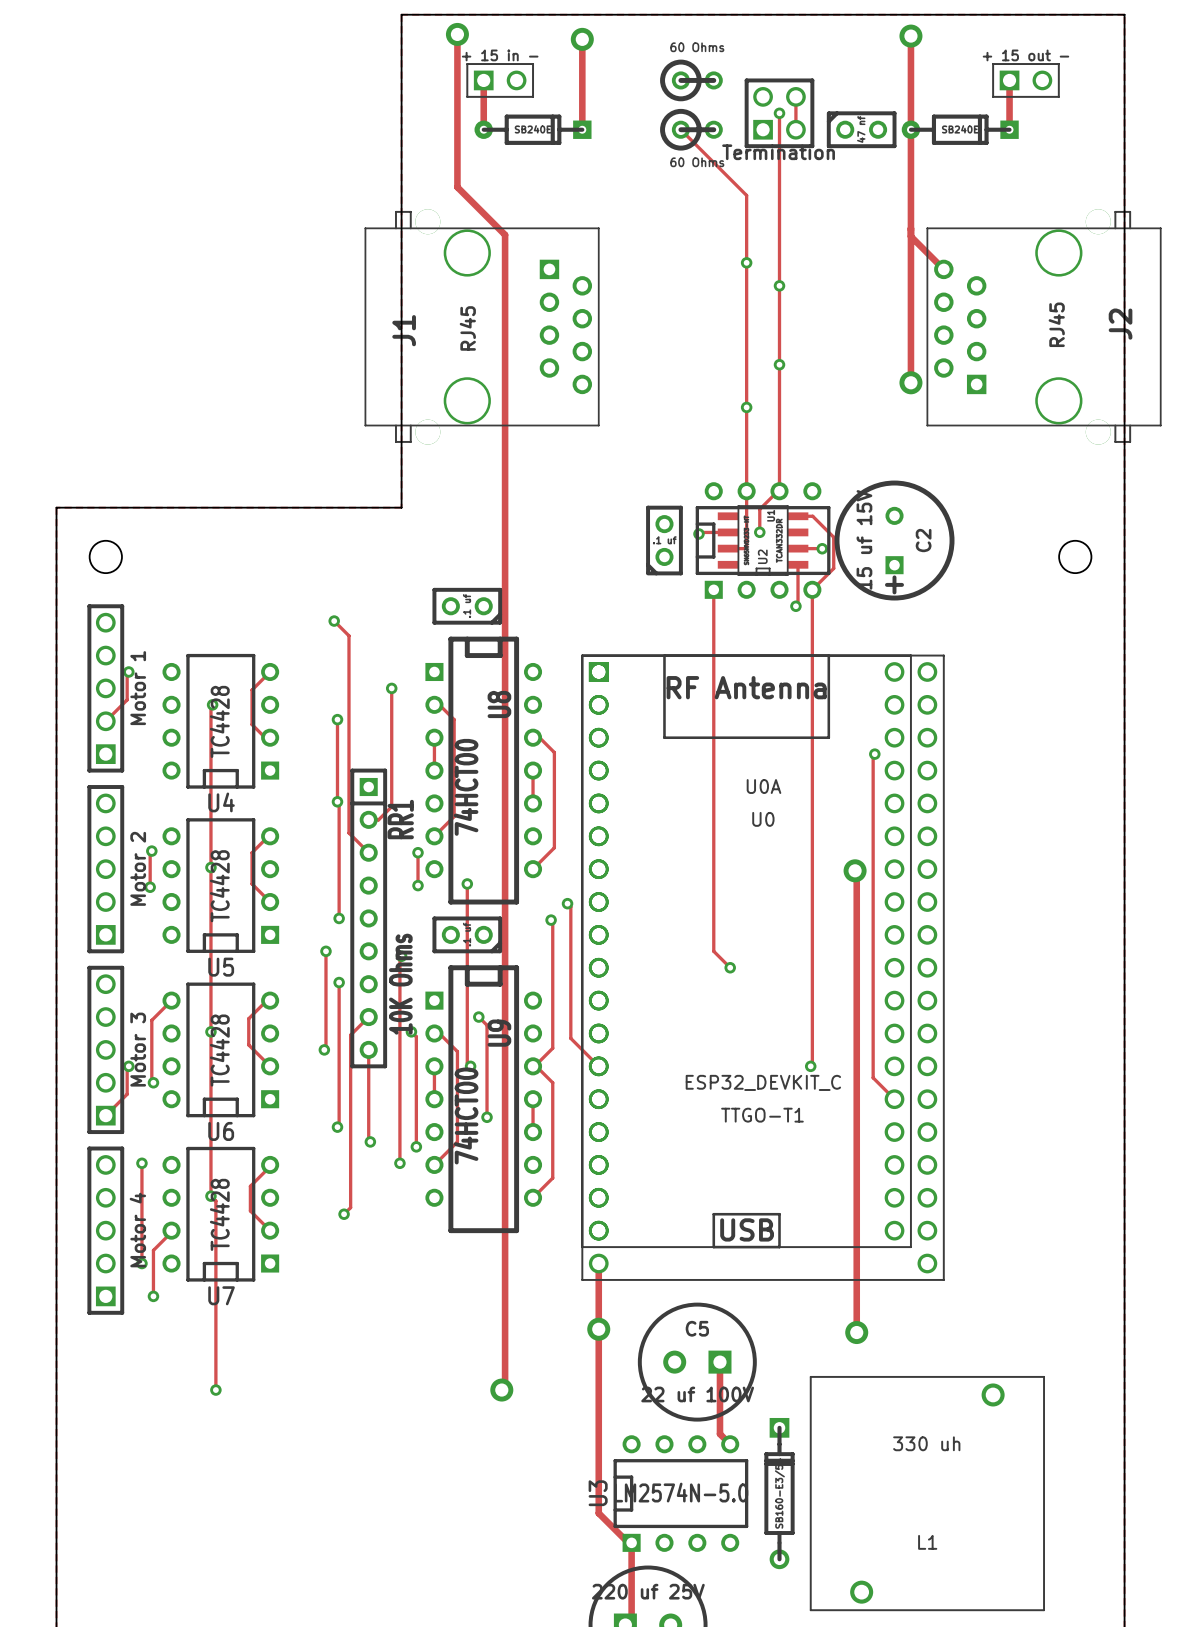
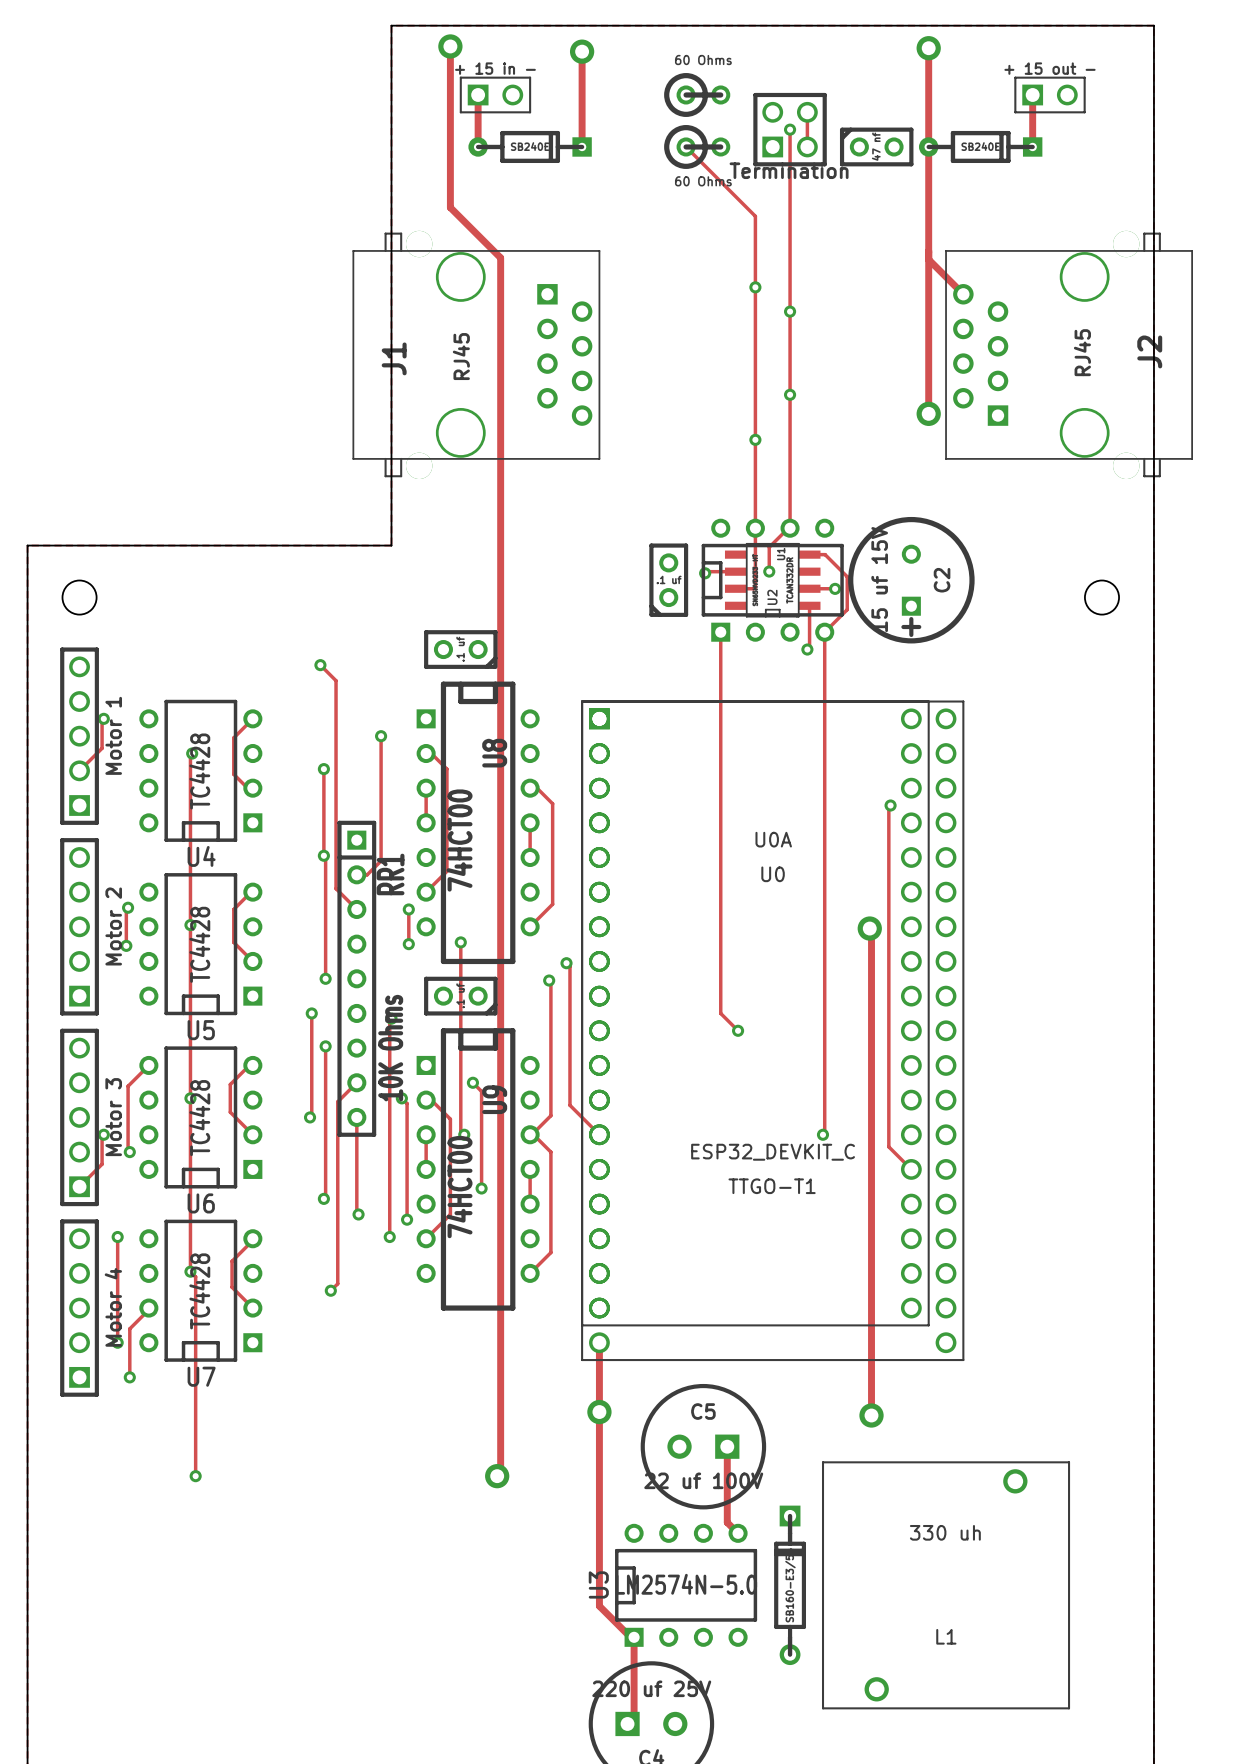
line: (664, 655) (828, 655) (828, 737) (664, 737) (664, 655) -> none
text: RF Antenna (746, 687) -> none
line: (713, 1214) (779, 1214) (779, 1247) (713, 1247) (713, 1214) -> none
text: USB (747, 1229) -> none

